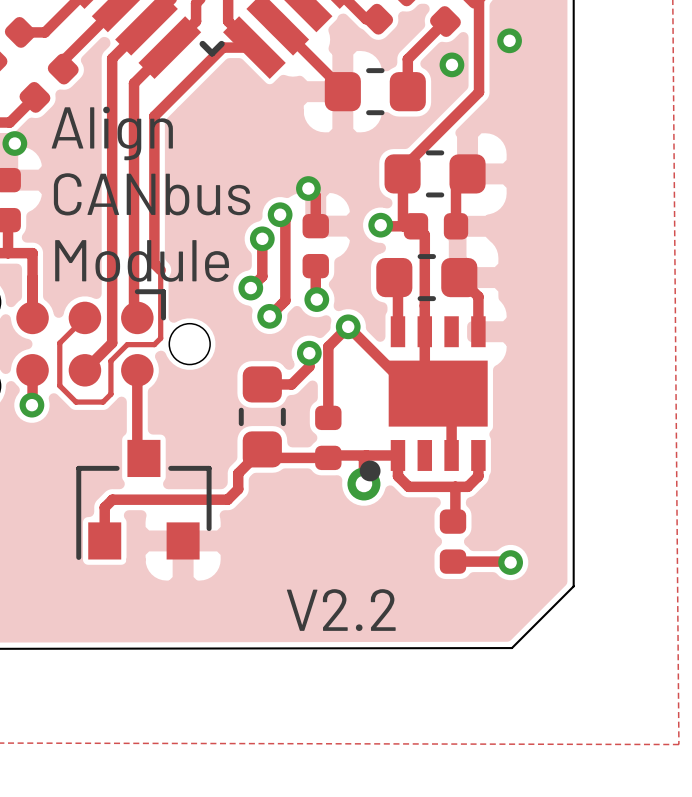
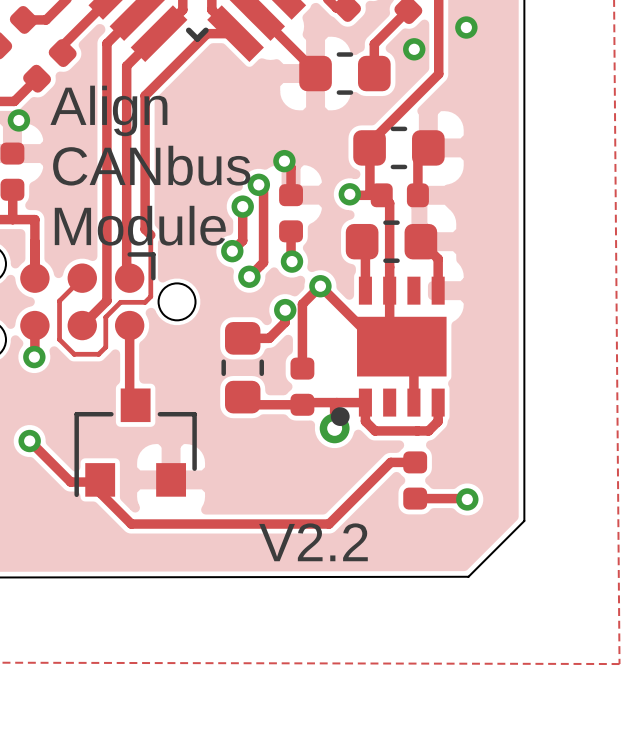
track: (262, 449) (238, 473) (238, 489) (227, 499) (112, 499) (104, 507) (104, 540) -> none
track: (455, 486) (455, 519) -> none
track: none -> (29, 441) (70, 482) (98, 482) (100, 479) (100, 492) (131, 524) (329, 524) (390, 462) (415, 462)
via: none -> (29, 441)

